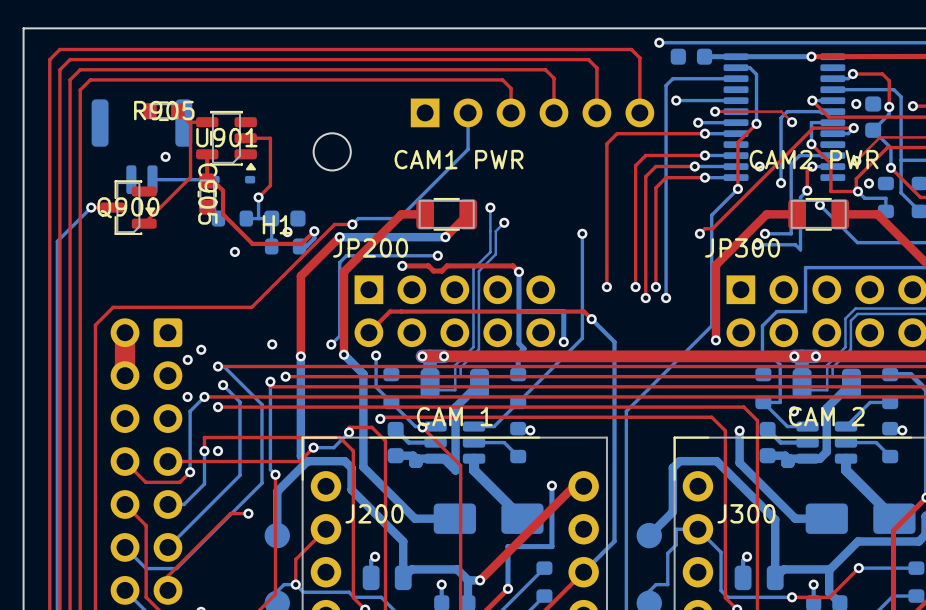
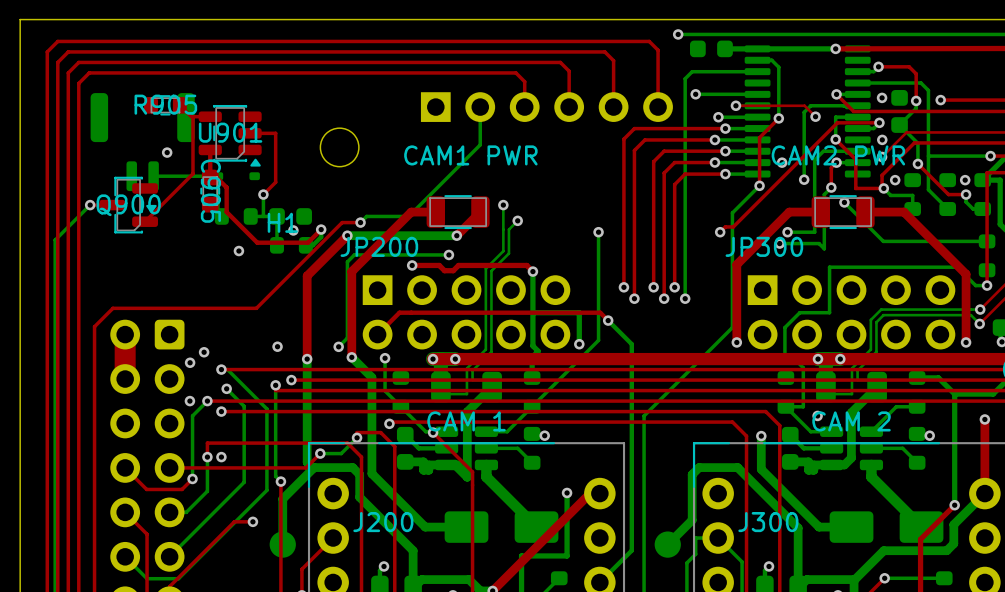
top track: none -> (714, 139) (644, 139) (634, 150) (634, 298)
bottom track: none -> (714, 139) (757, 139)
via: none -> (714, 139)
via: none -> (882, 139)
via: none -> (634, 298)

